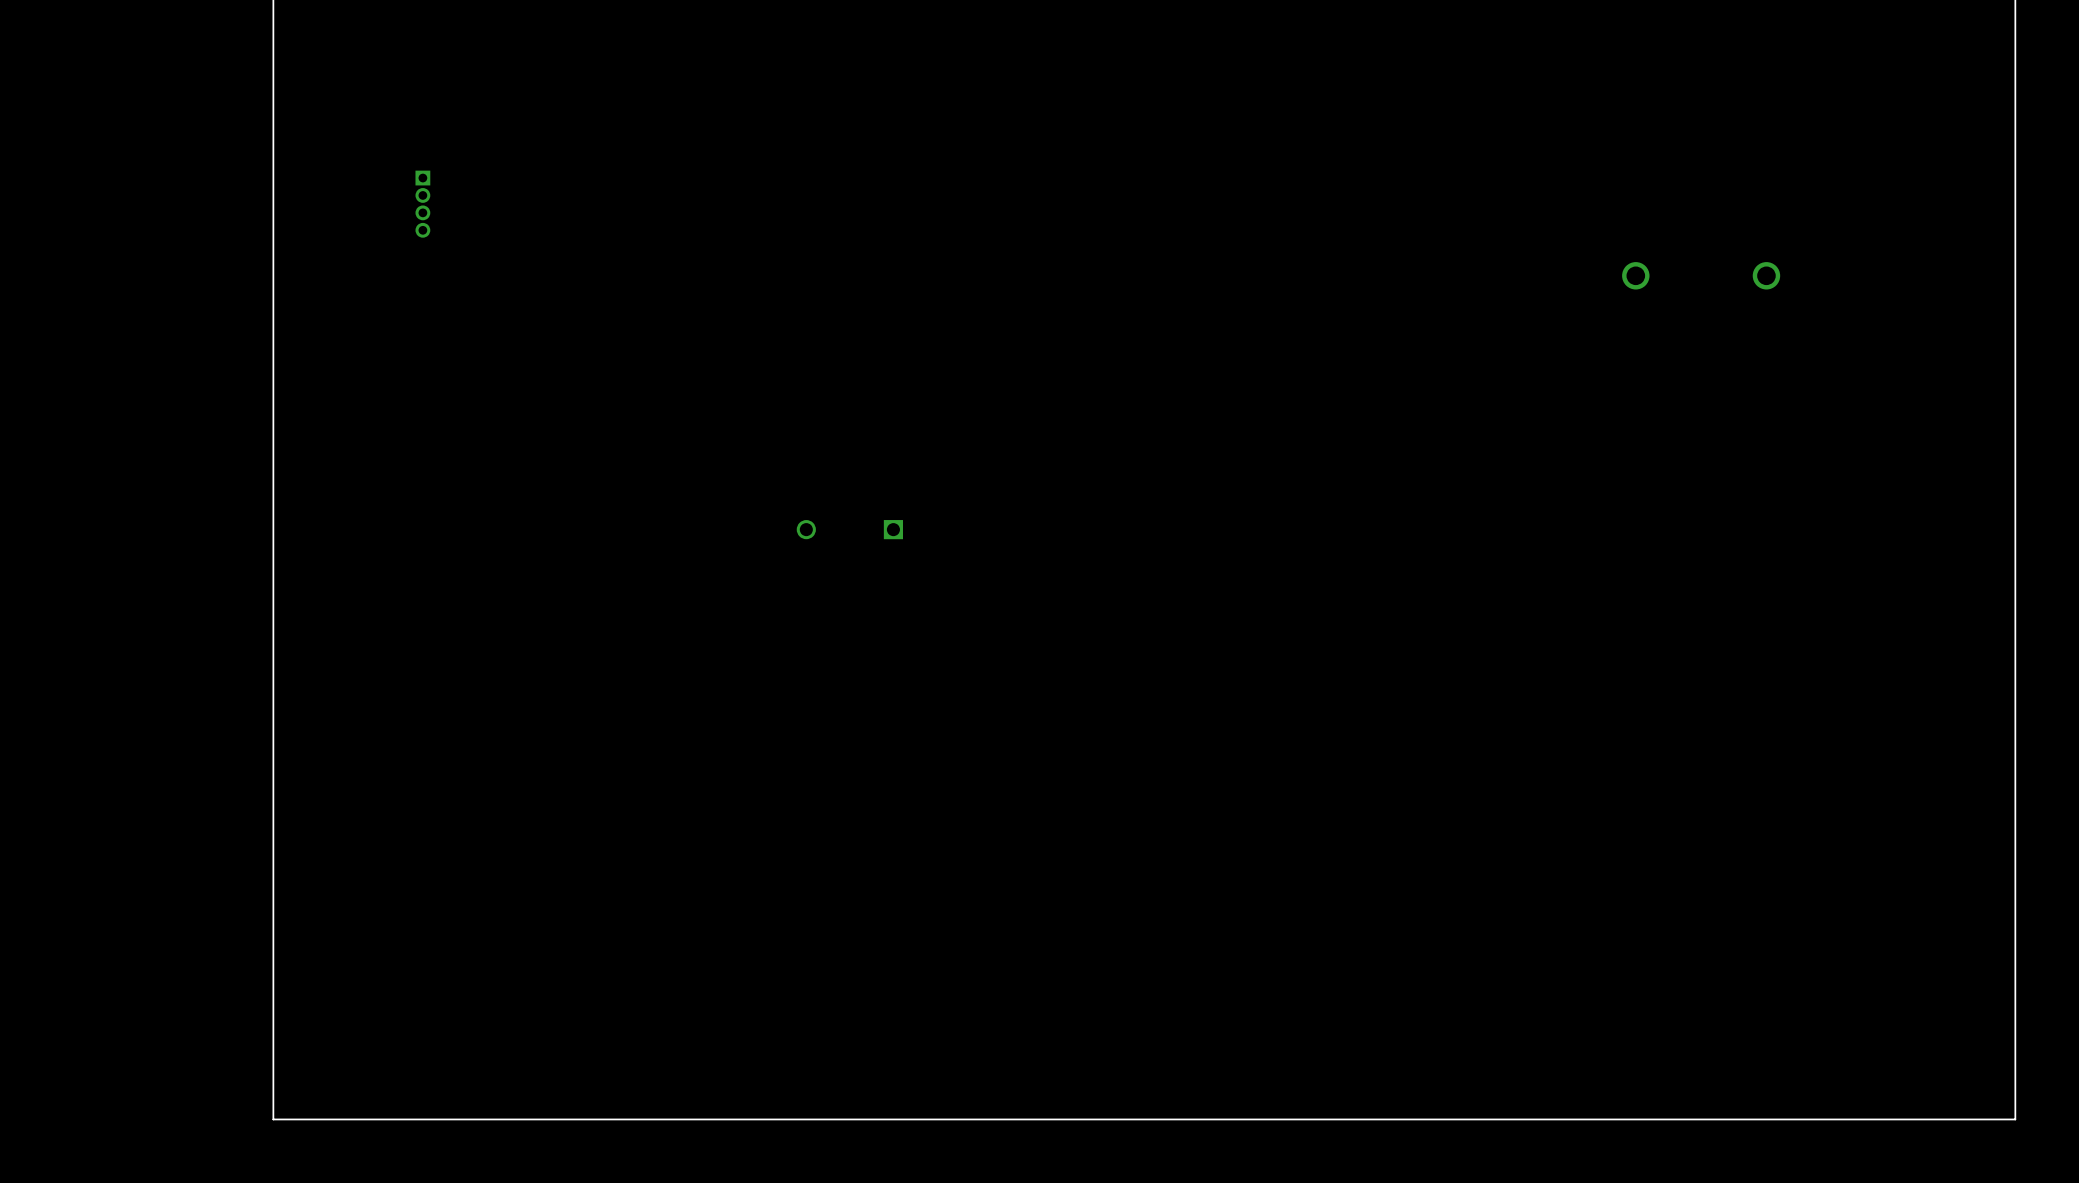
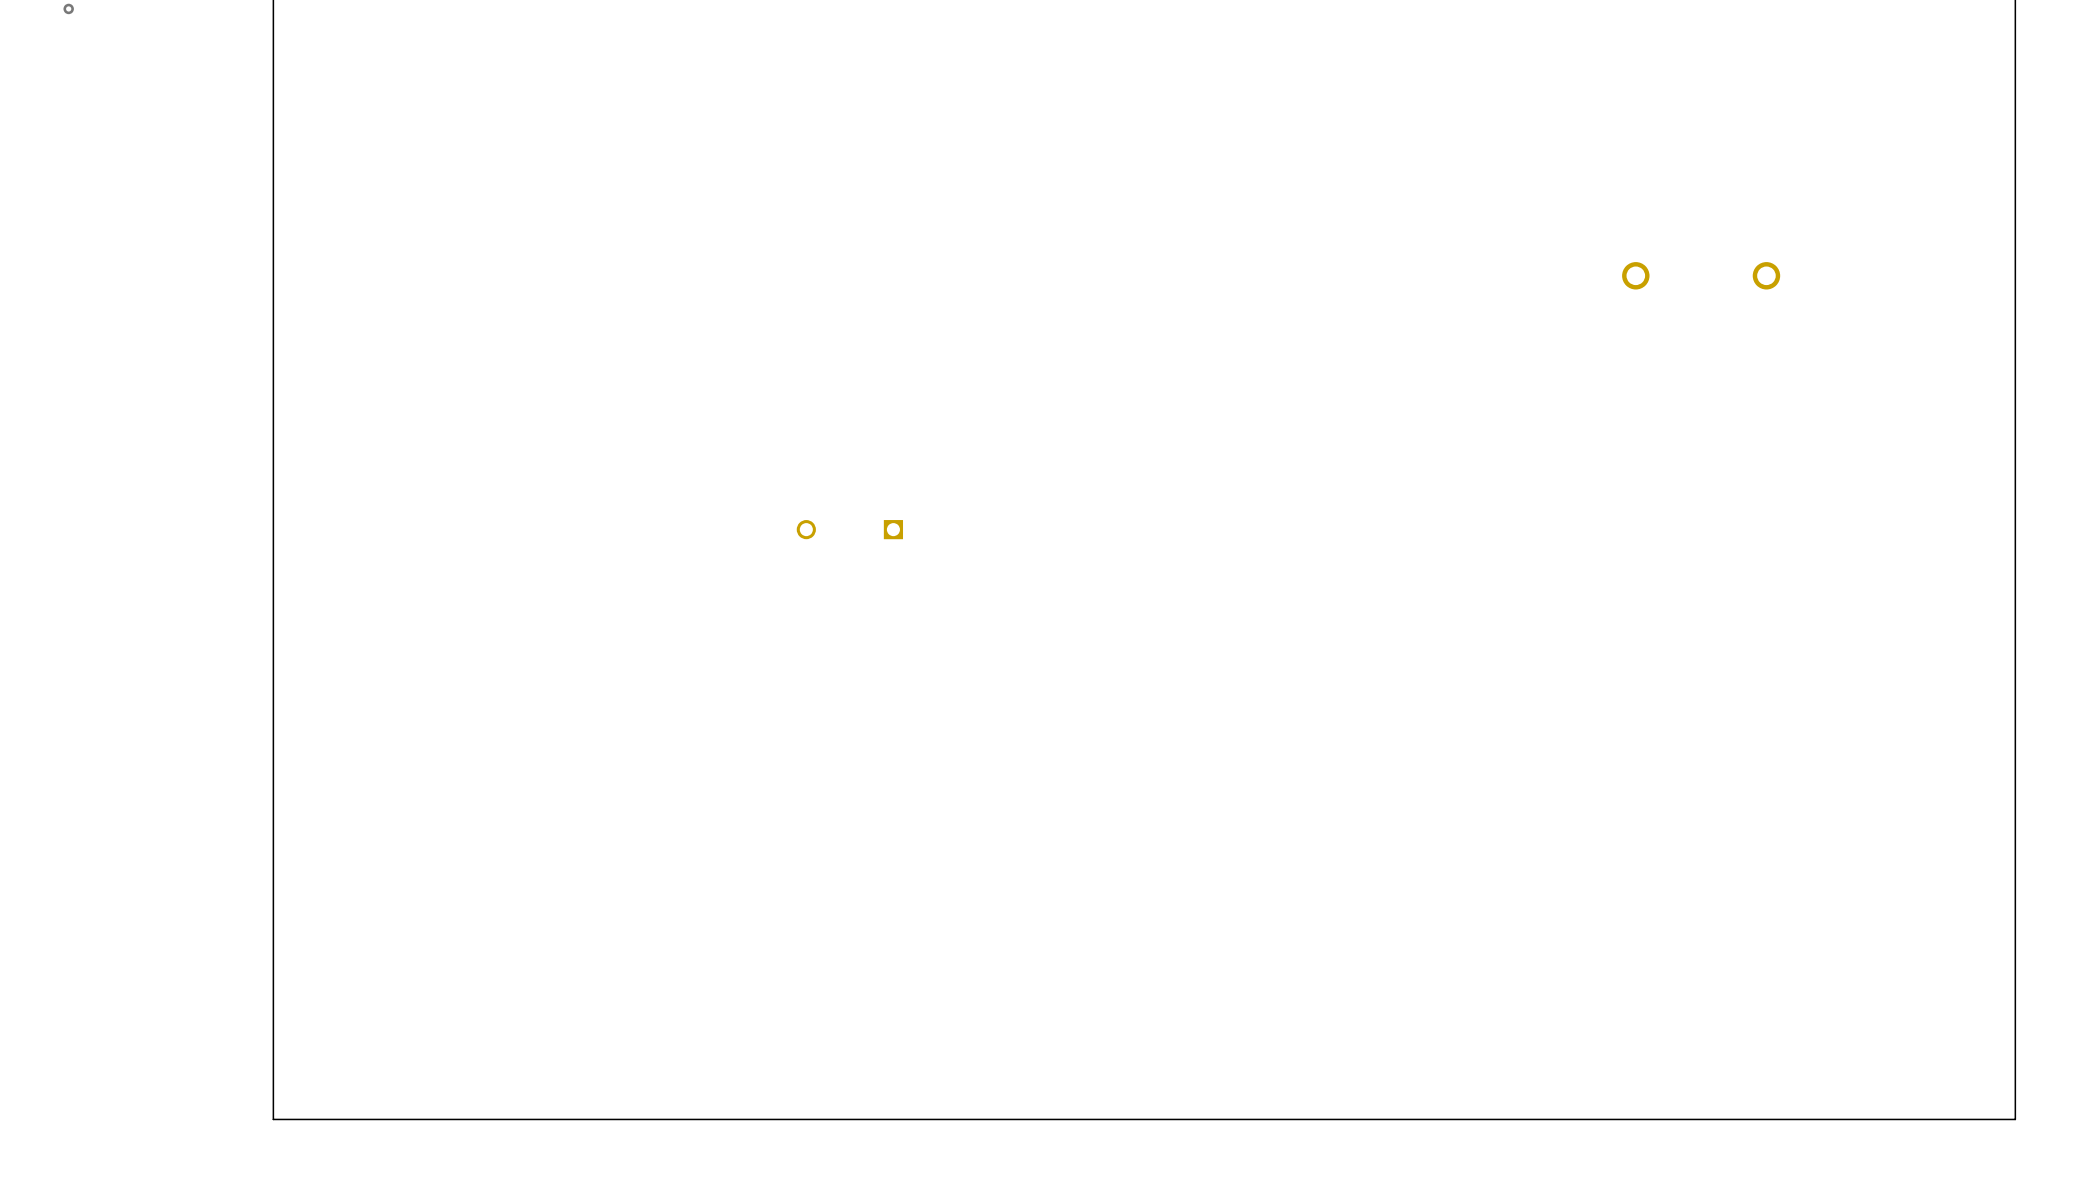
via: none -> (68, 8)
part: (422, 204) -> none

